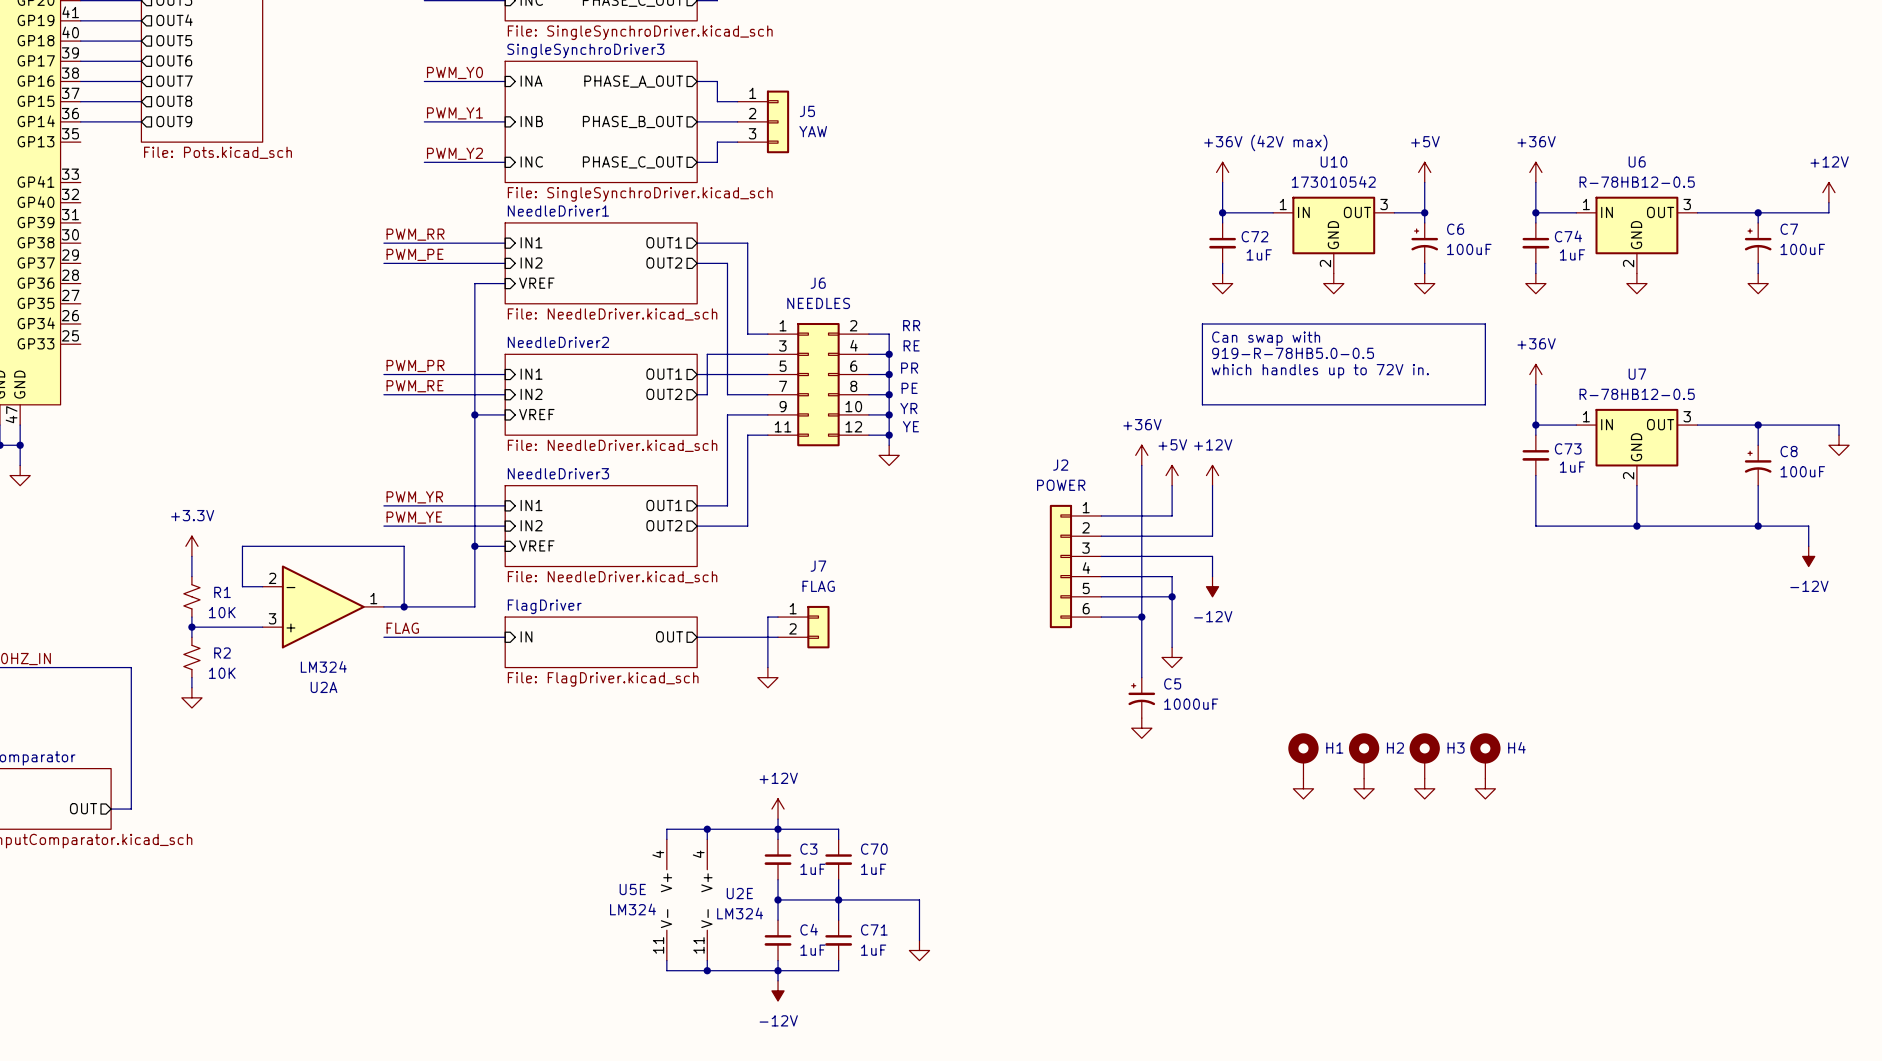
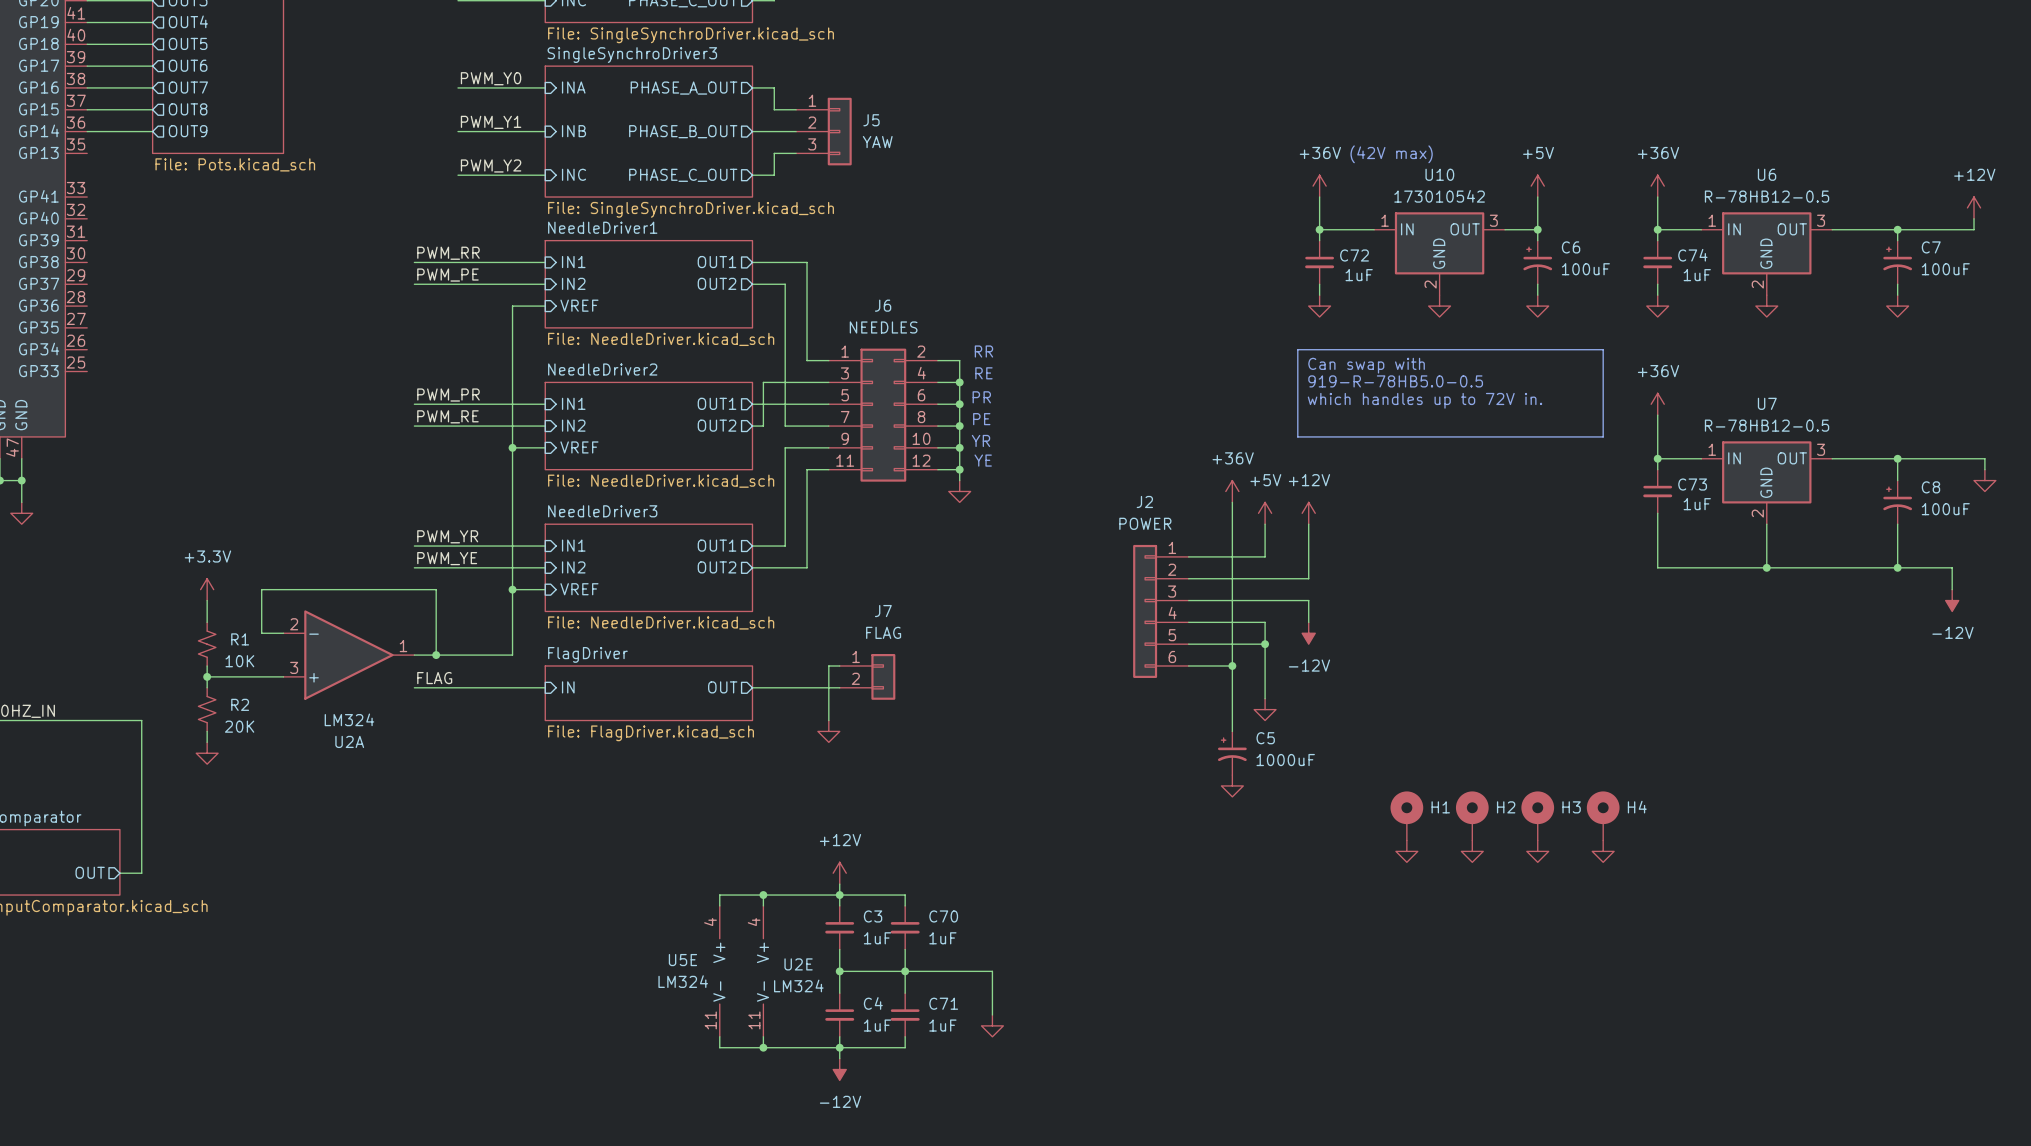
R2 value: 10K (222, 673) -> 20K (239, 726)

